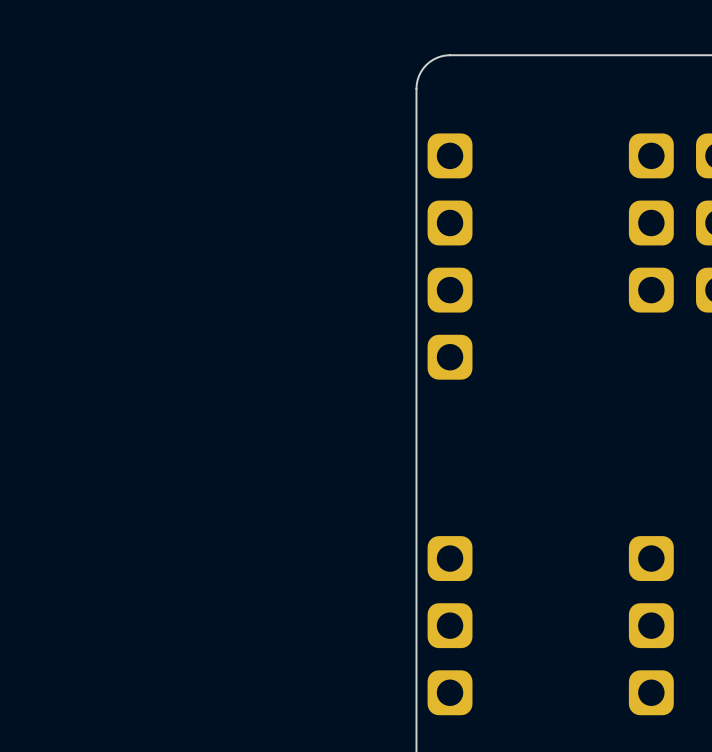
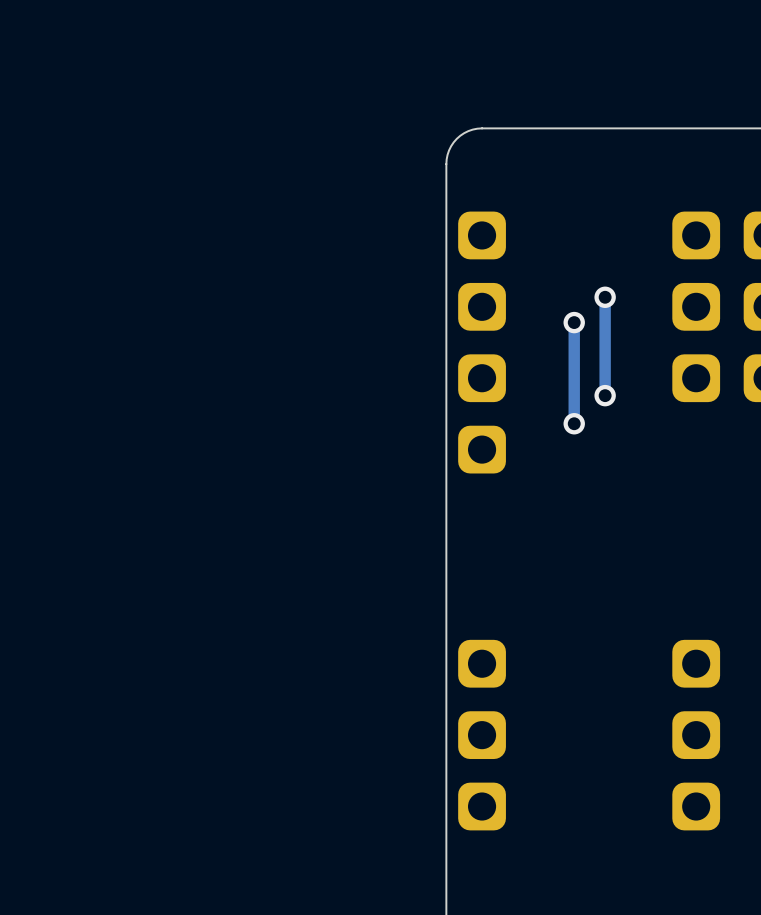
track: none -> (605, 297) (605, 395)
via: none -> (605, 297)
track: none -> (574, 322) (574, 423)
via: none -> (574, 322)
via: none -> (605, 395)
via: none -> (574, 423)

